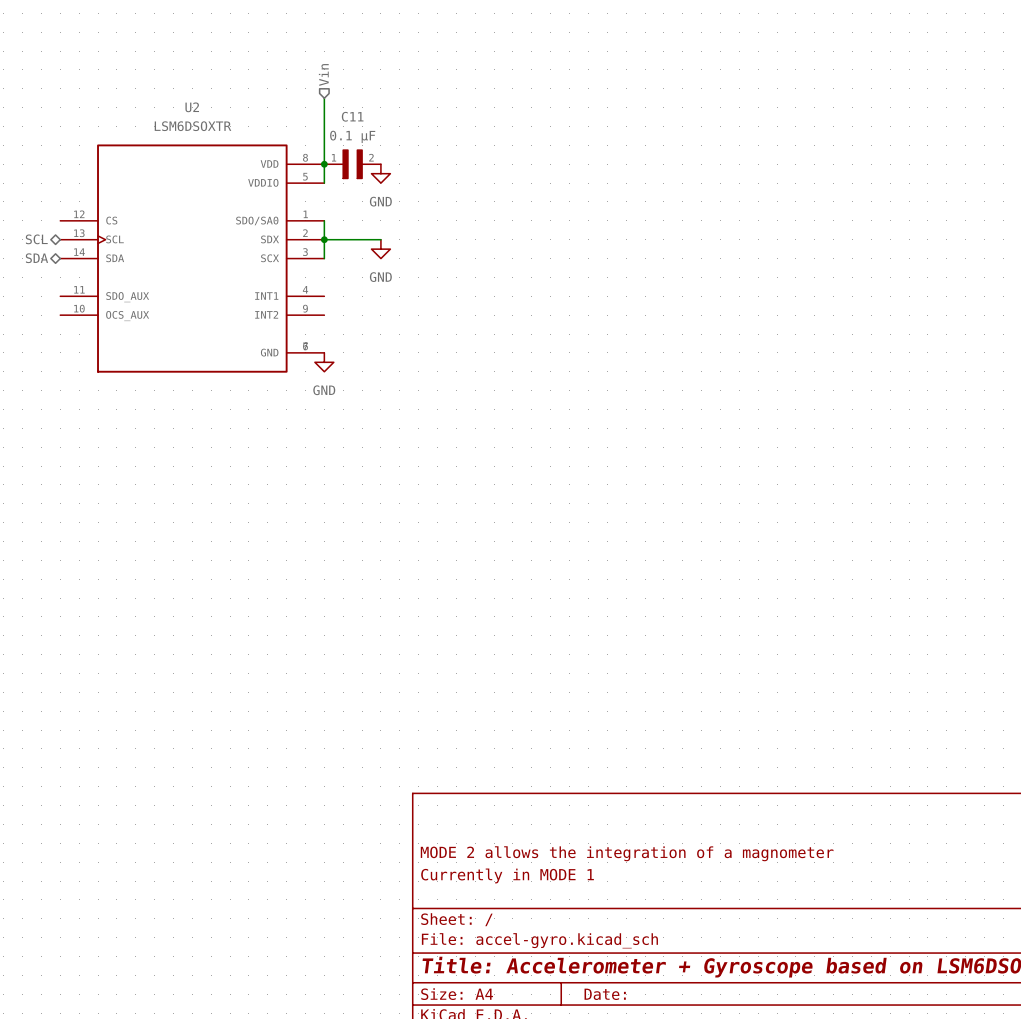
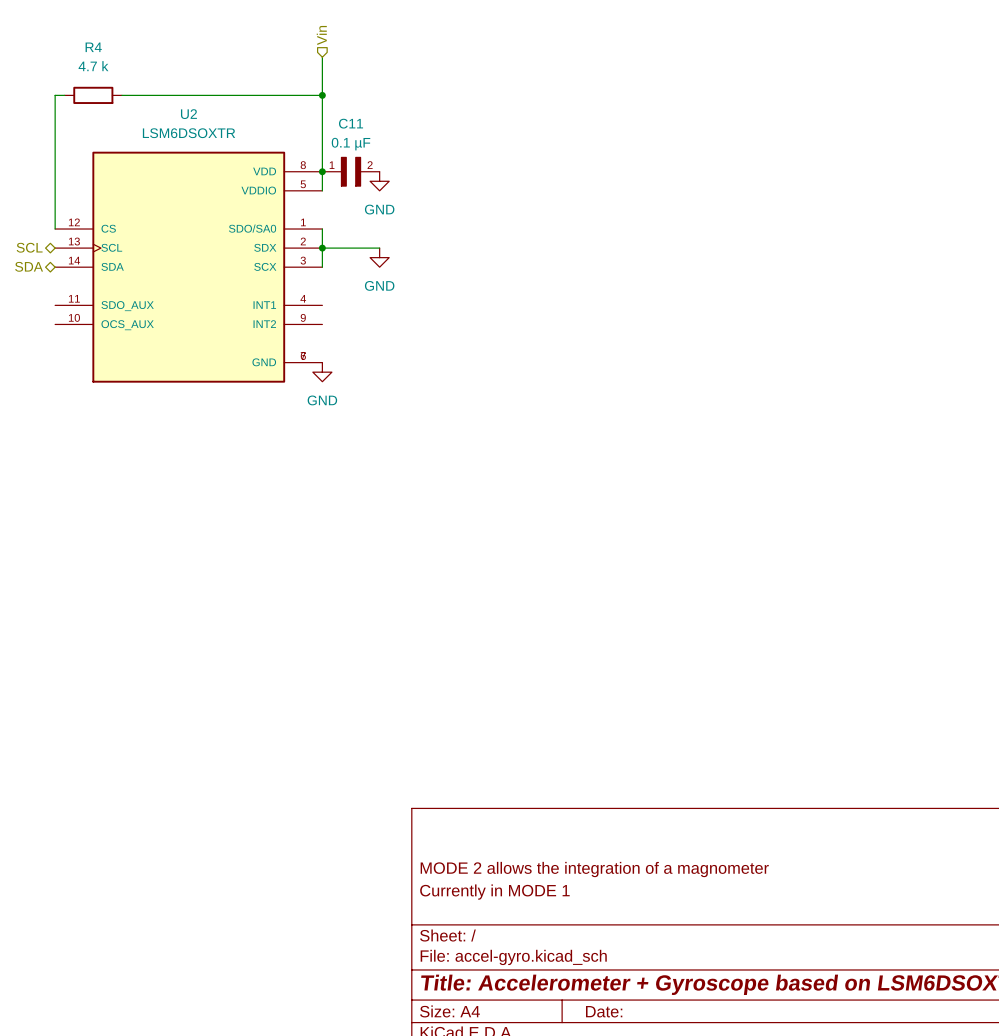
wire: none -> (322, 57) (322, 104)
hierarchical label position: Vin (323, 74) -> Vin (321, 35)
wire: none -> (64, 95) (55, 95) (55, 229)
R4: none -> 4.7 k (93, 95)
wire: none -> (121, 95) (322, 95)
junction: none -> (322, 95)

